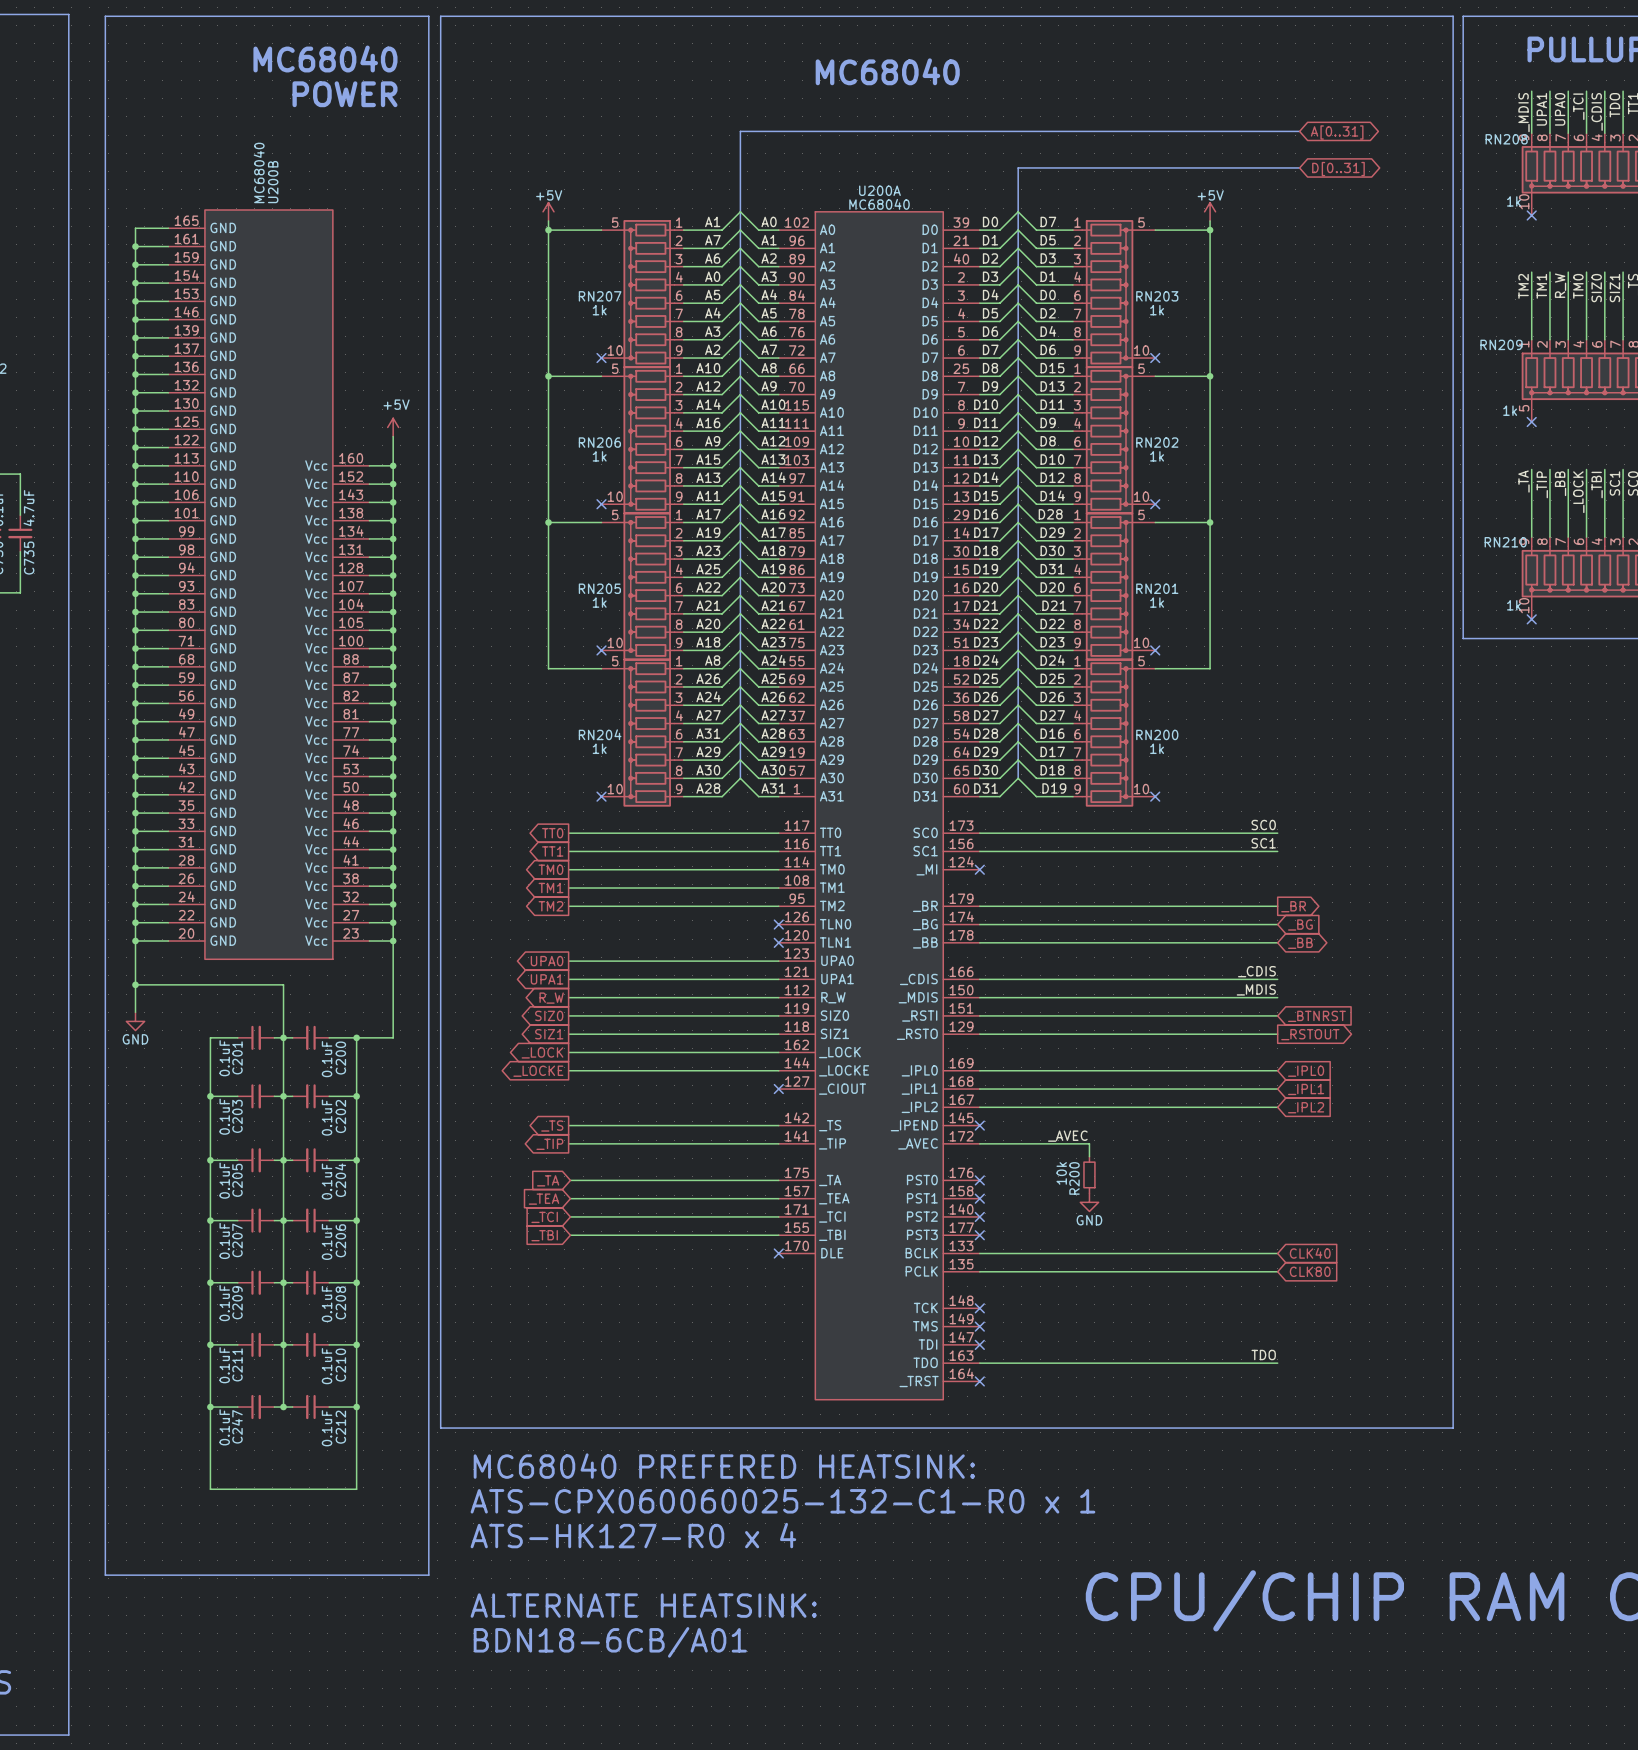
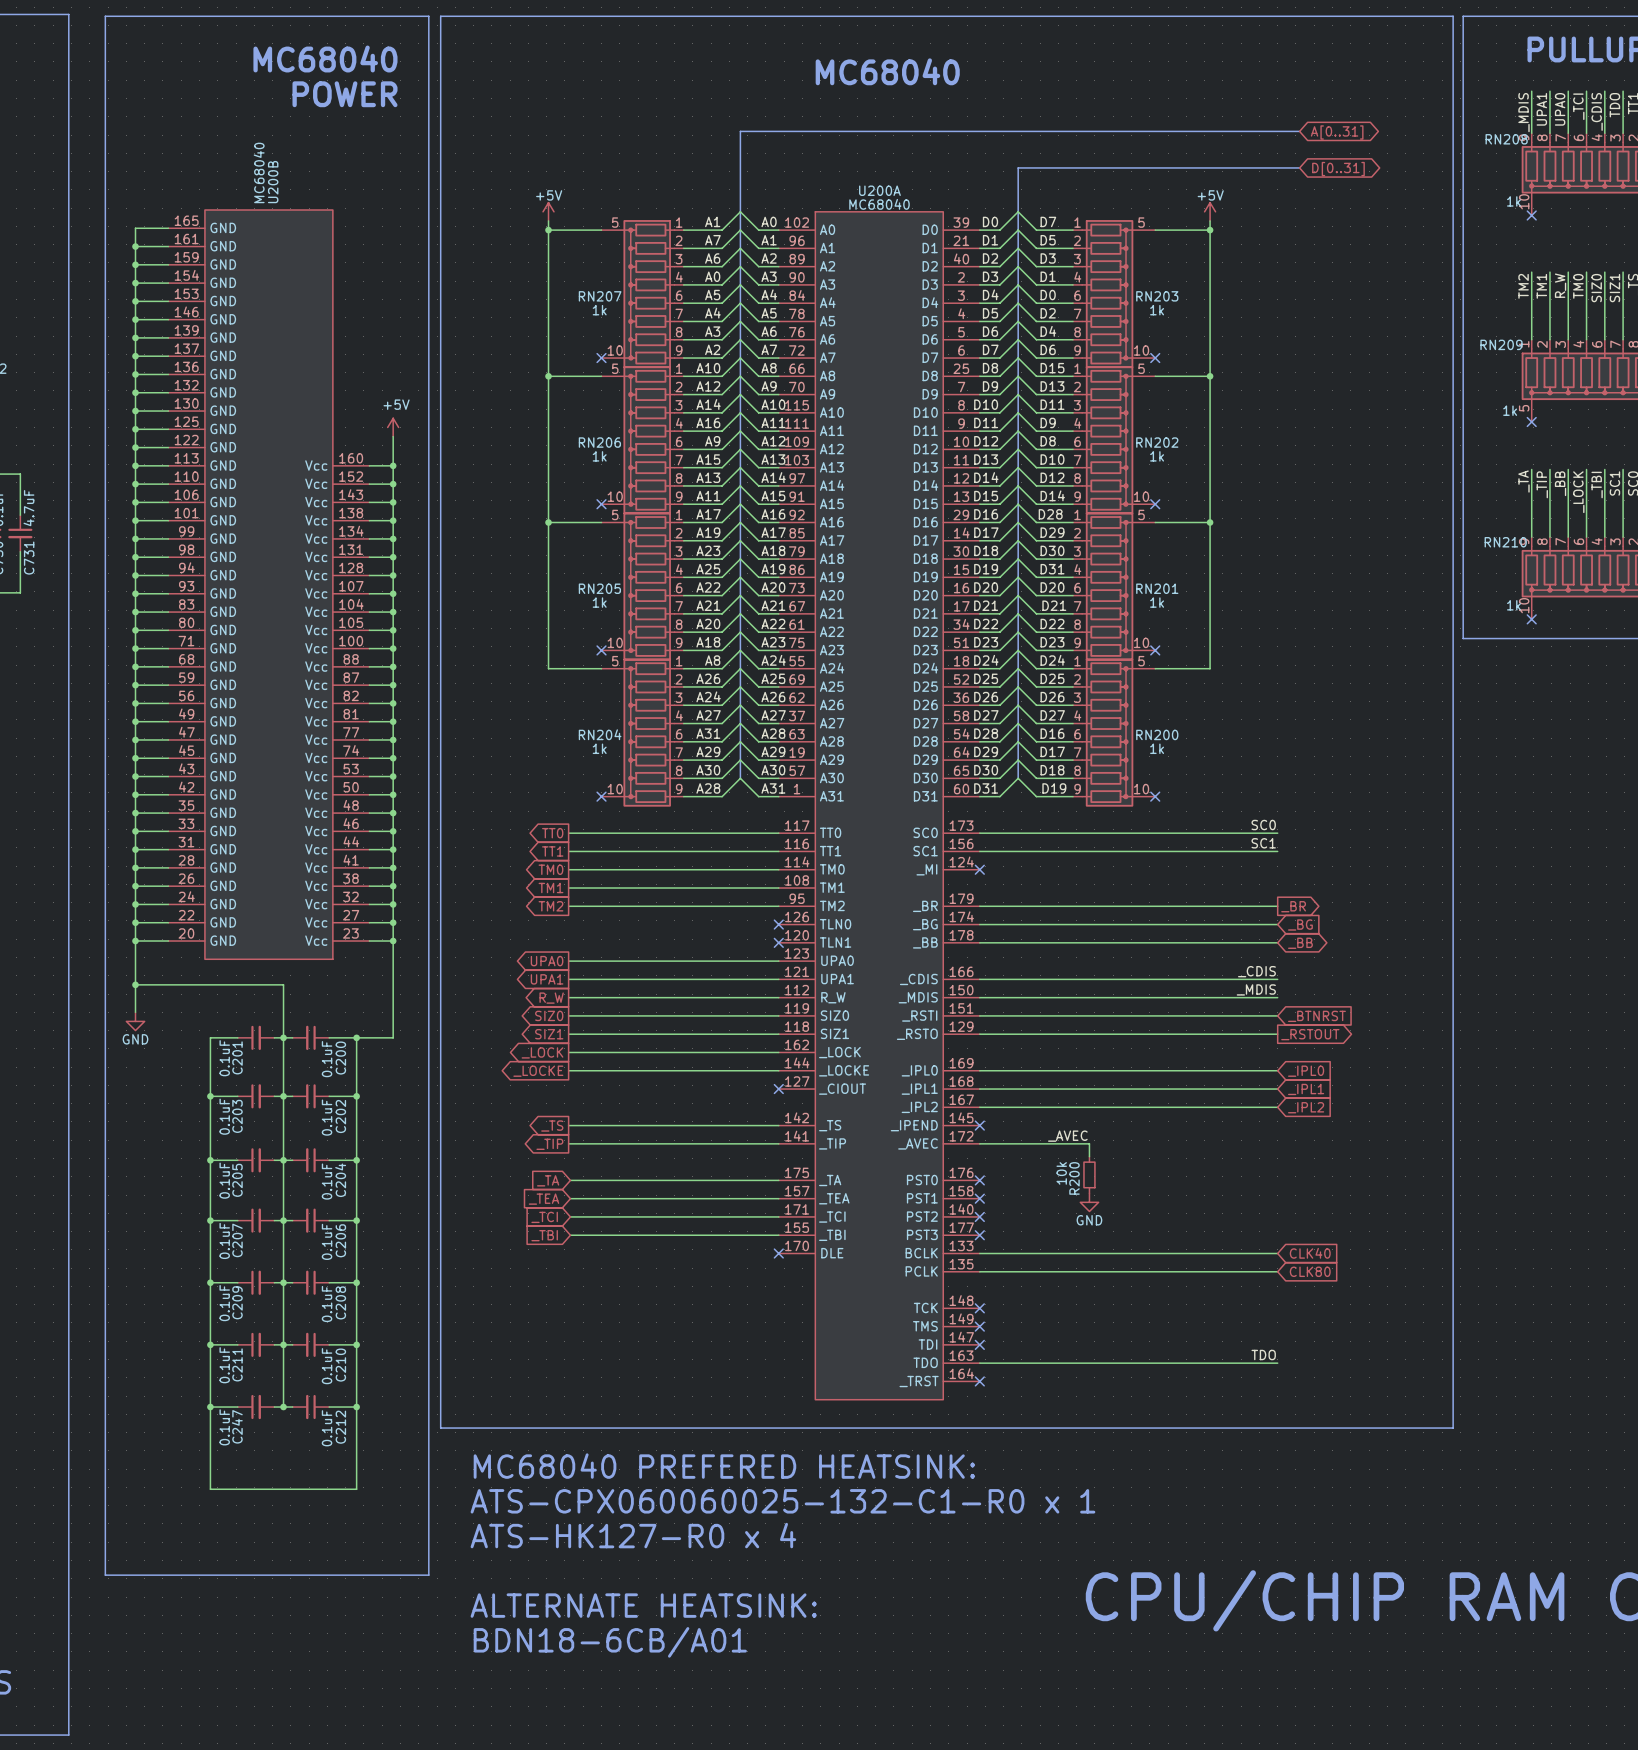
C735 name: C735 (29, 558) -> C731 (29, 558)

